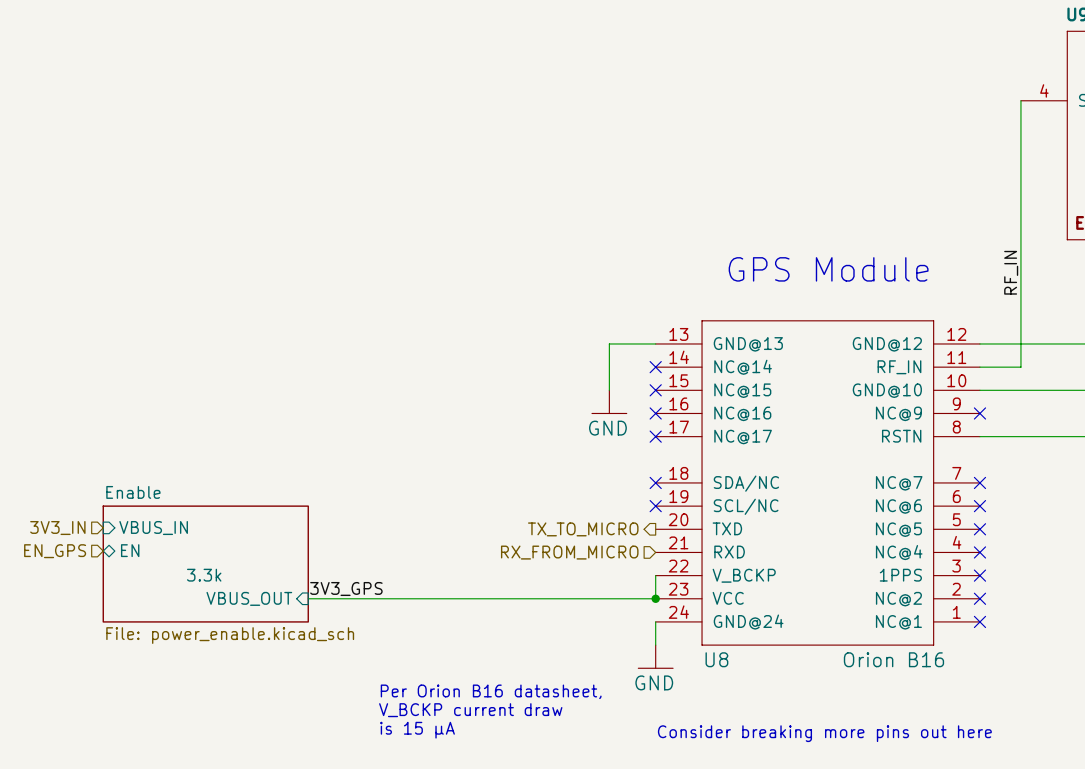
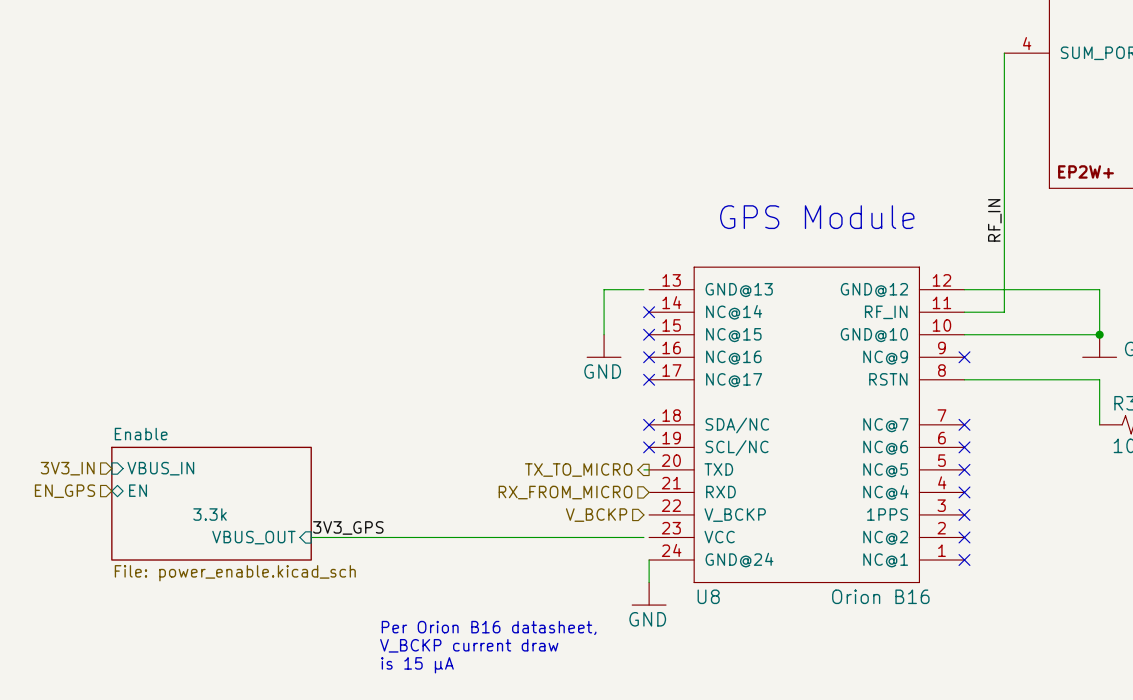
wire: (650, 343) (655, 343) -> (643, 469) (649, 469)
hierarchical label: none -> V_BCKP (596, 515)
wire: (655, 575) (655, 598) (650, 598) -> none
junction: (655, 598) -> none
text: Consider breaking more pins out here (824, 733) -> none

